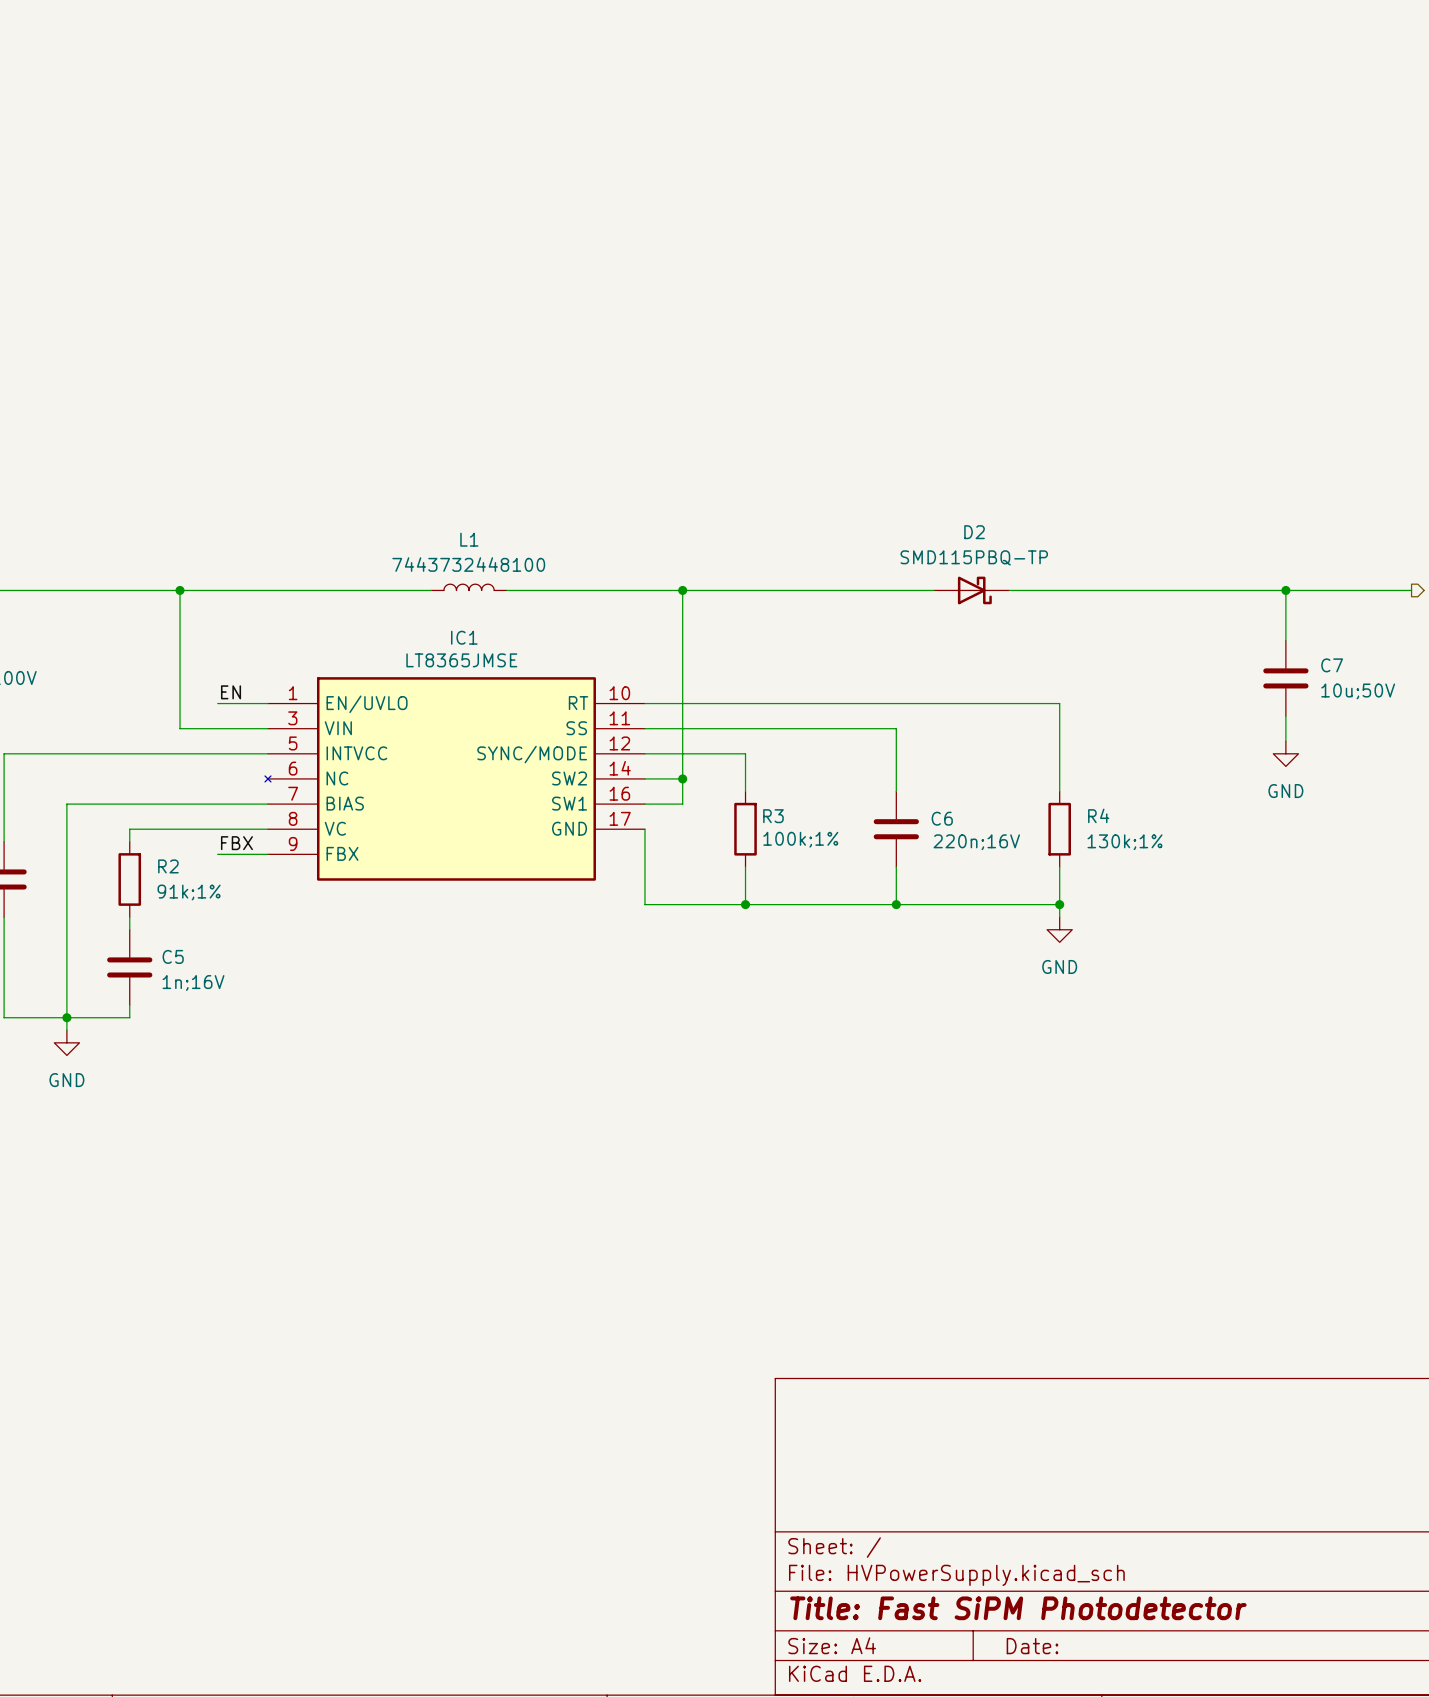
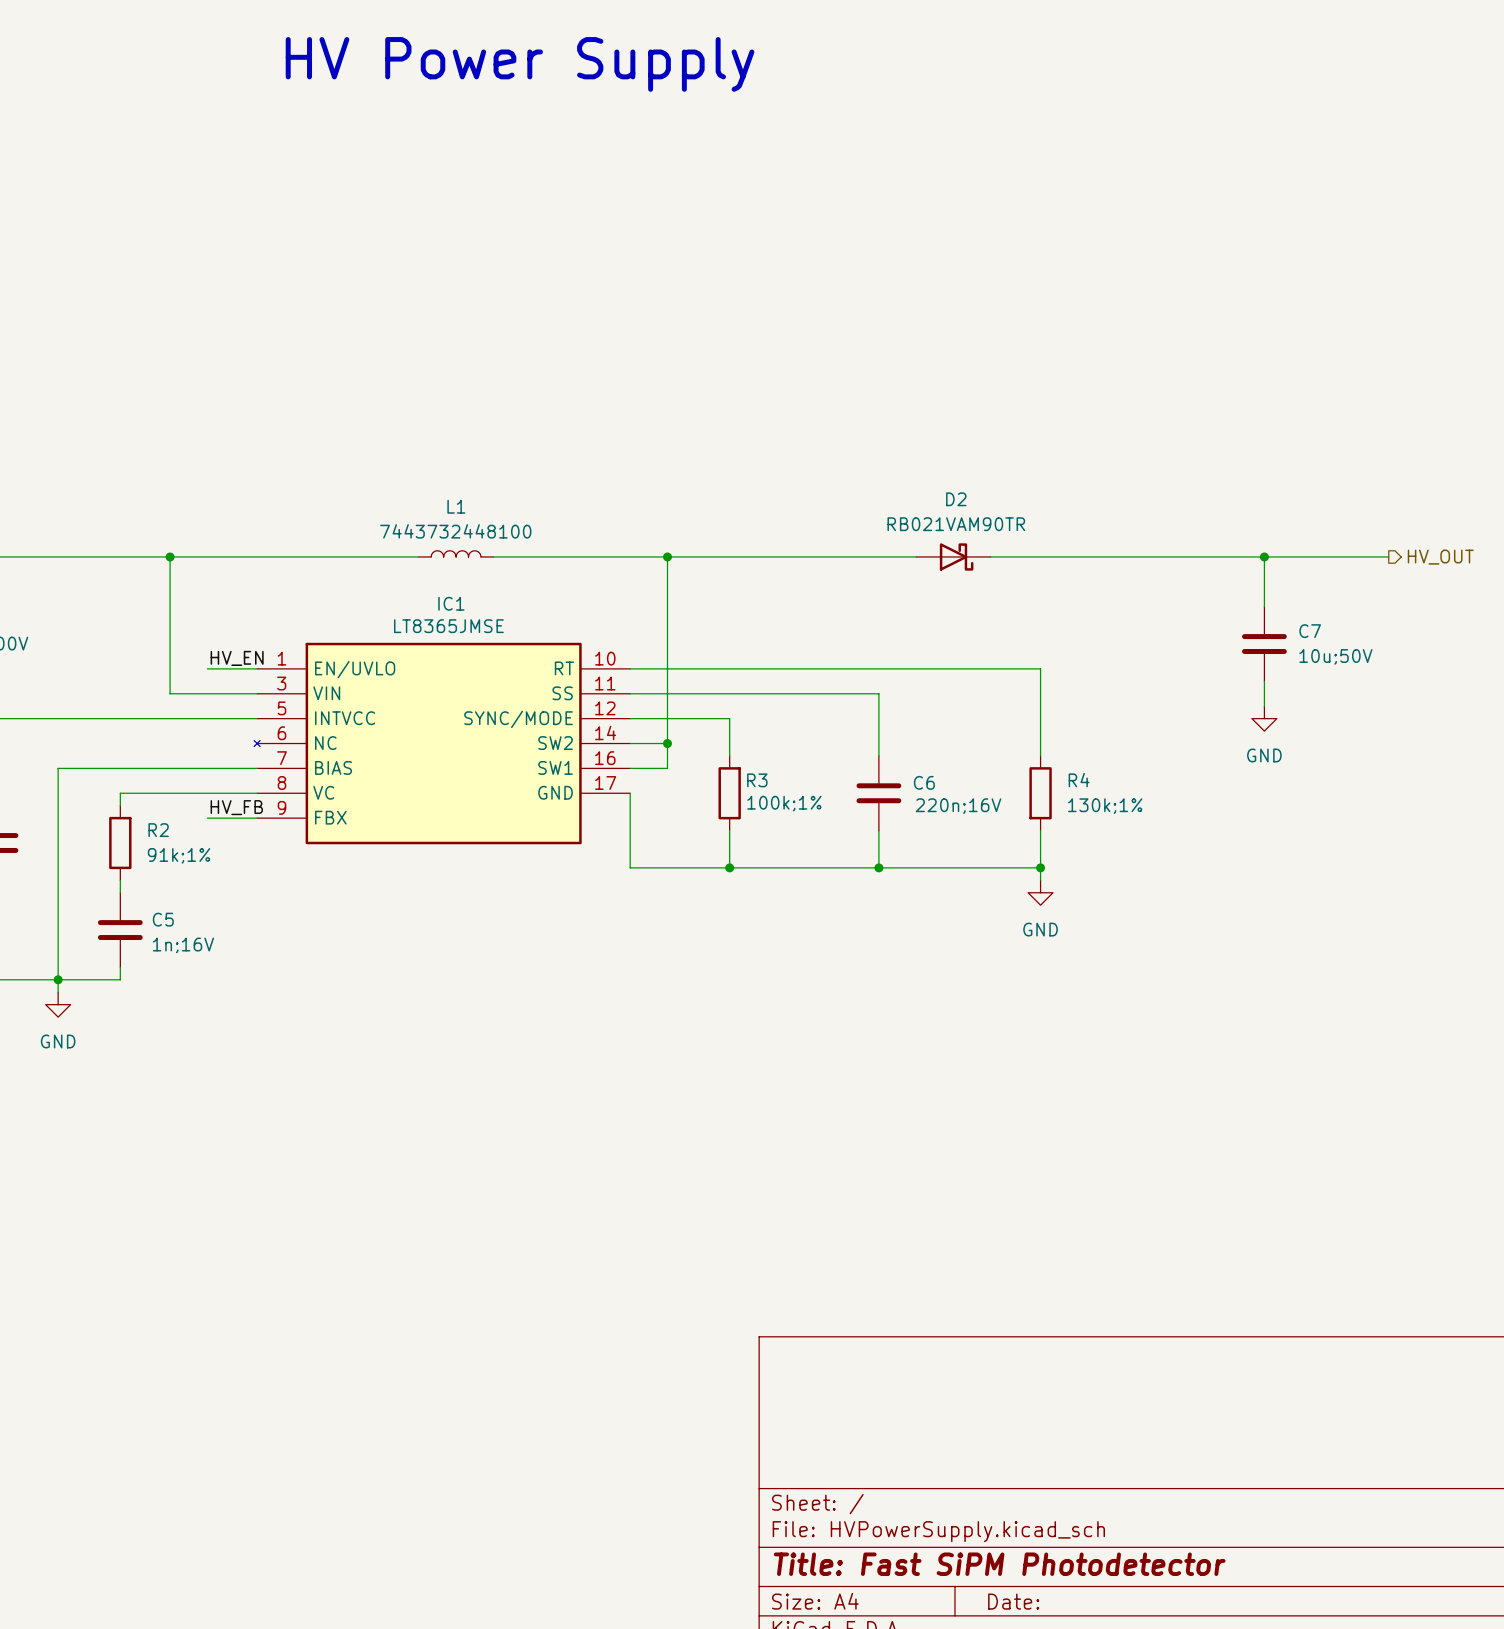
text: none -> HV Power Supply (520, 64)
D2 value: SMD115PBQ-TP (974, 557) -> RB021VAM90TR (956, 524)
label: EN (231, 692) -> HV_EN (237, 658)
label: FBX (236, 843) -> HV_FB (236, 807)

